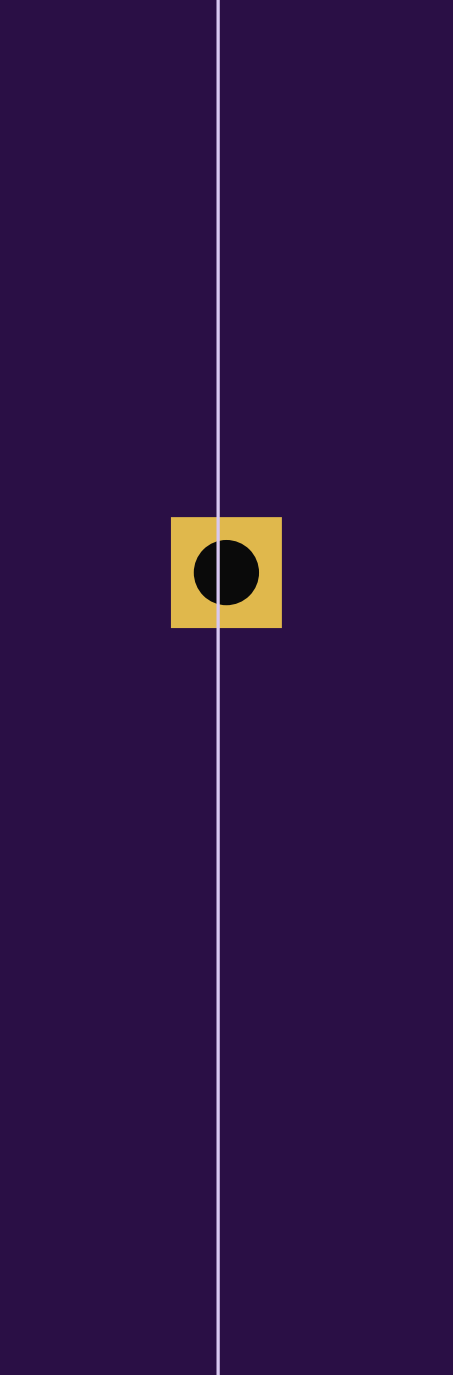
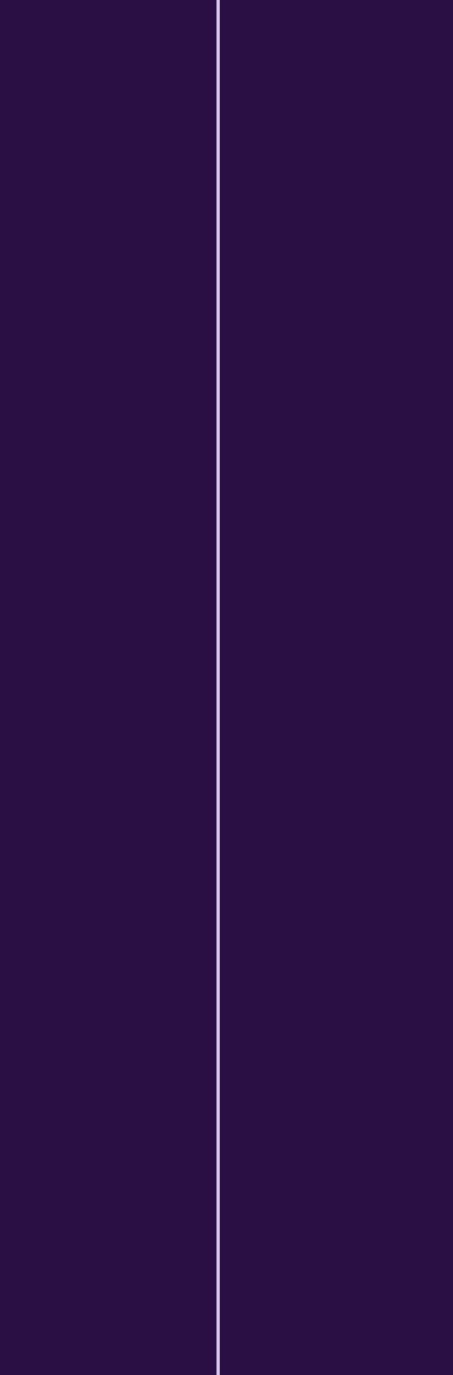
part: (226, 572) -> none

